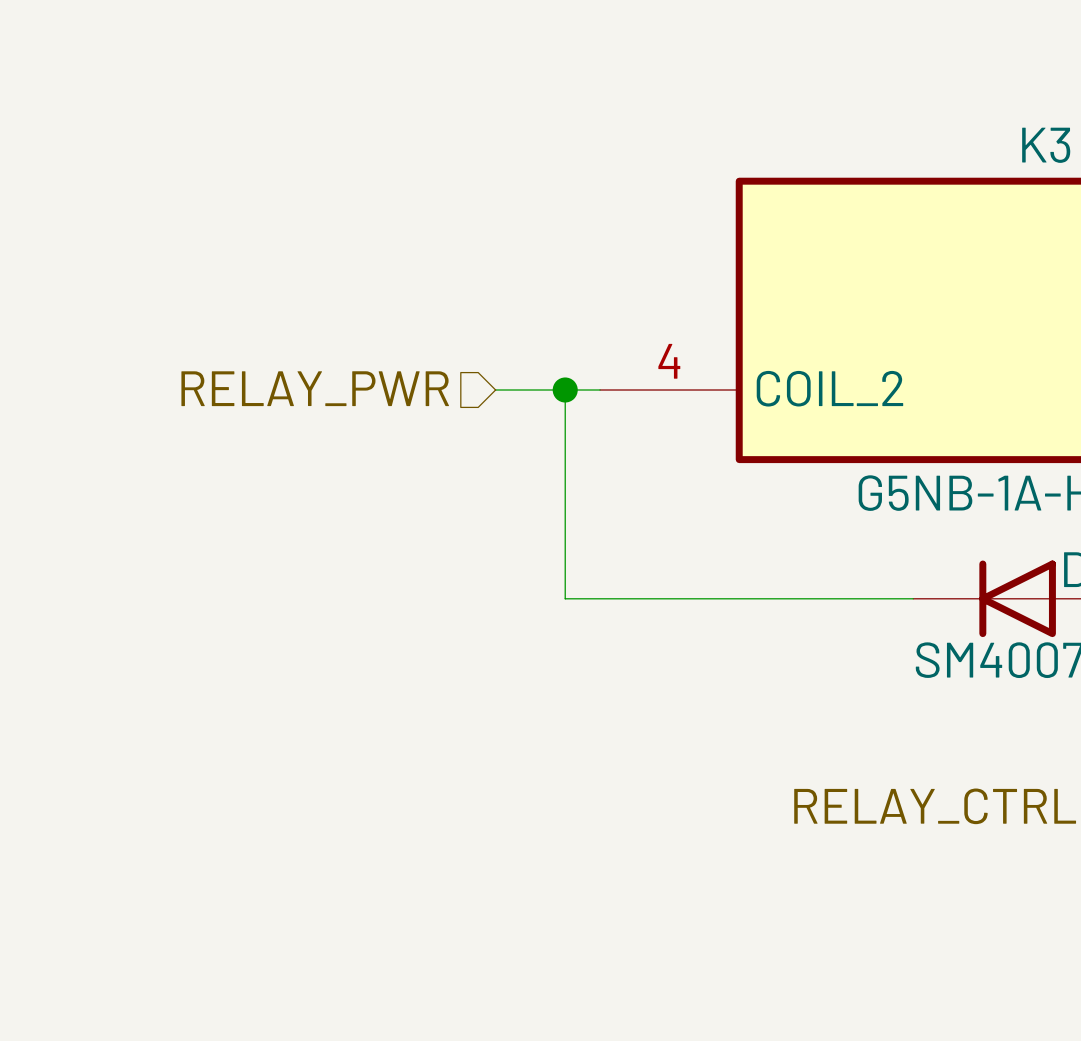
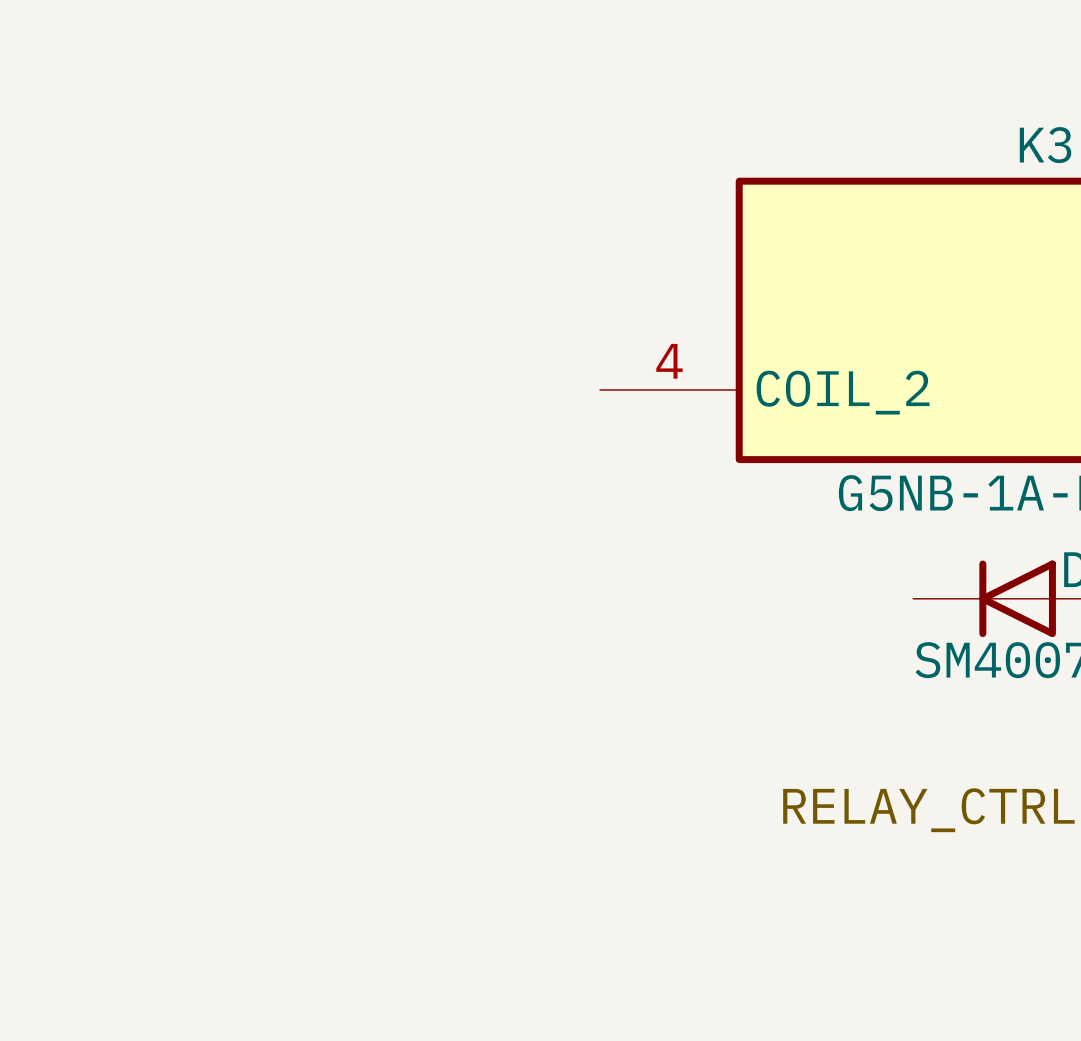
hierarchical label: RELAY_PWR (315, 388) -> none
wire: (495, 390) (600, 390) -> none
wire: (565, 390) (565, 598) (913, 598) -> none
junction: (565, 390) -> none

